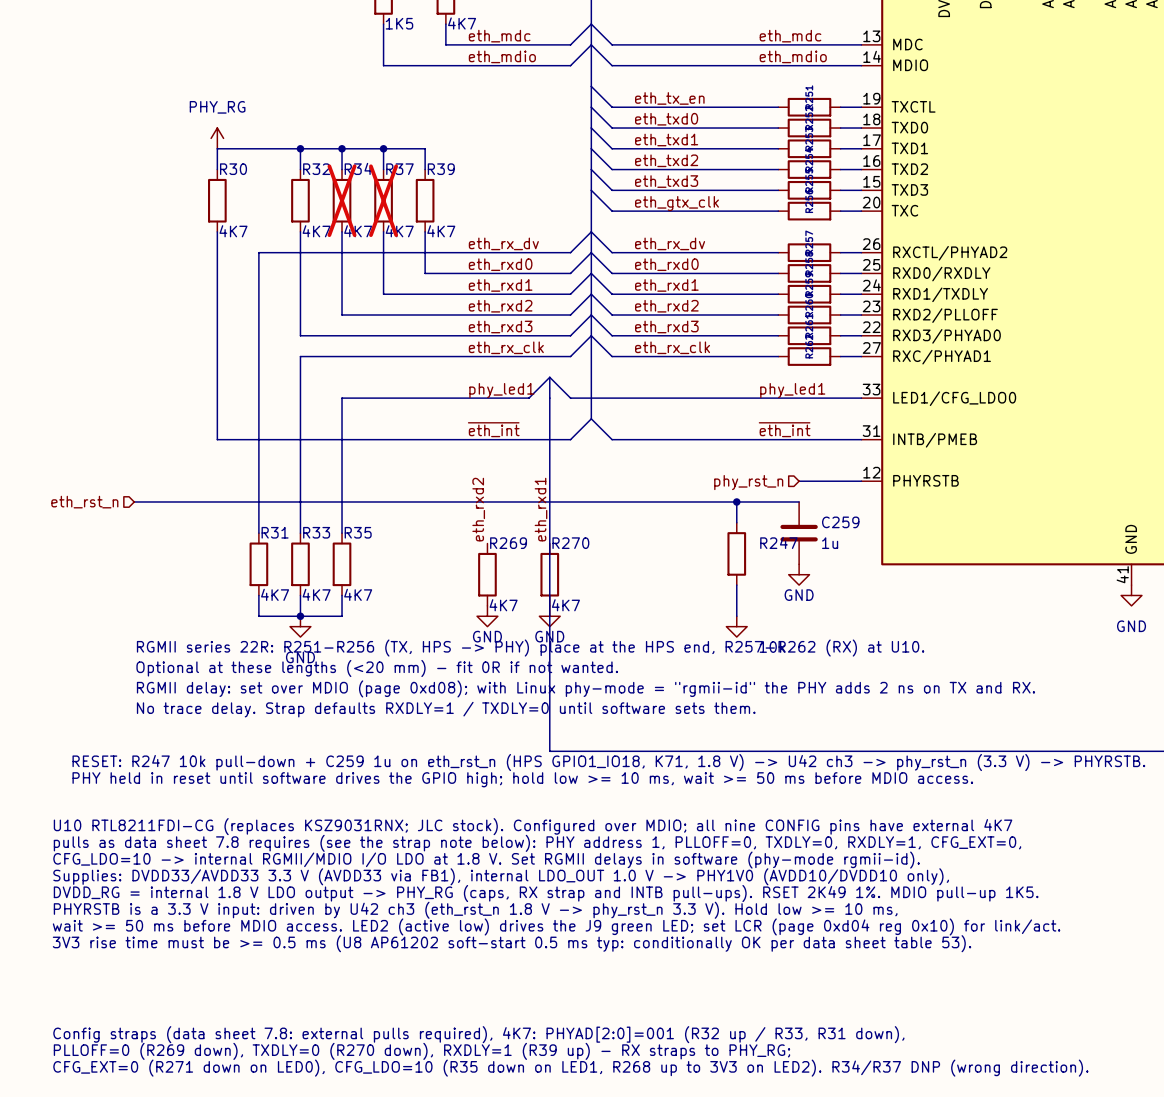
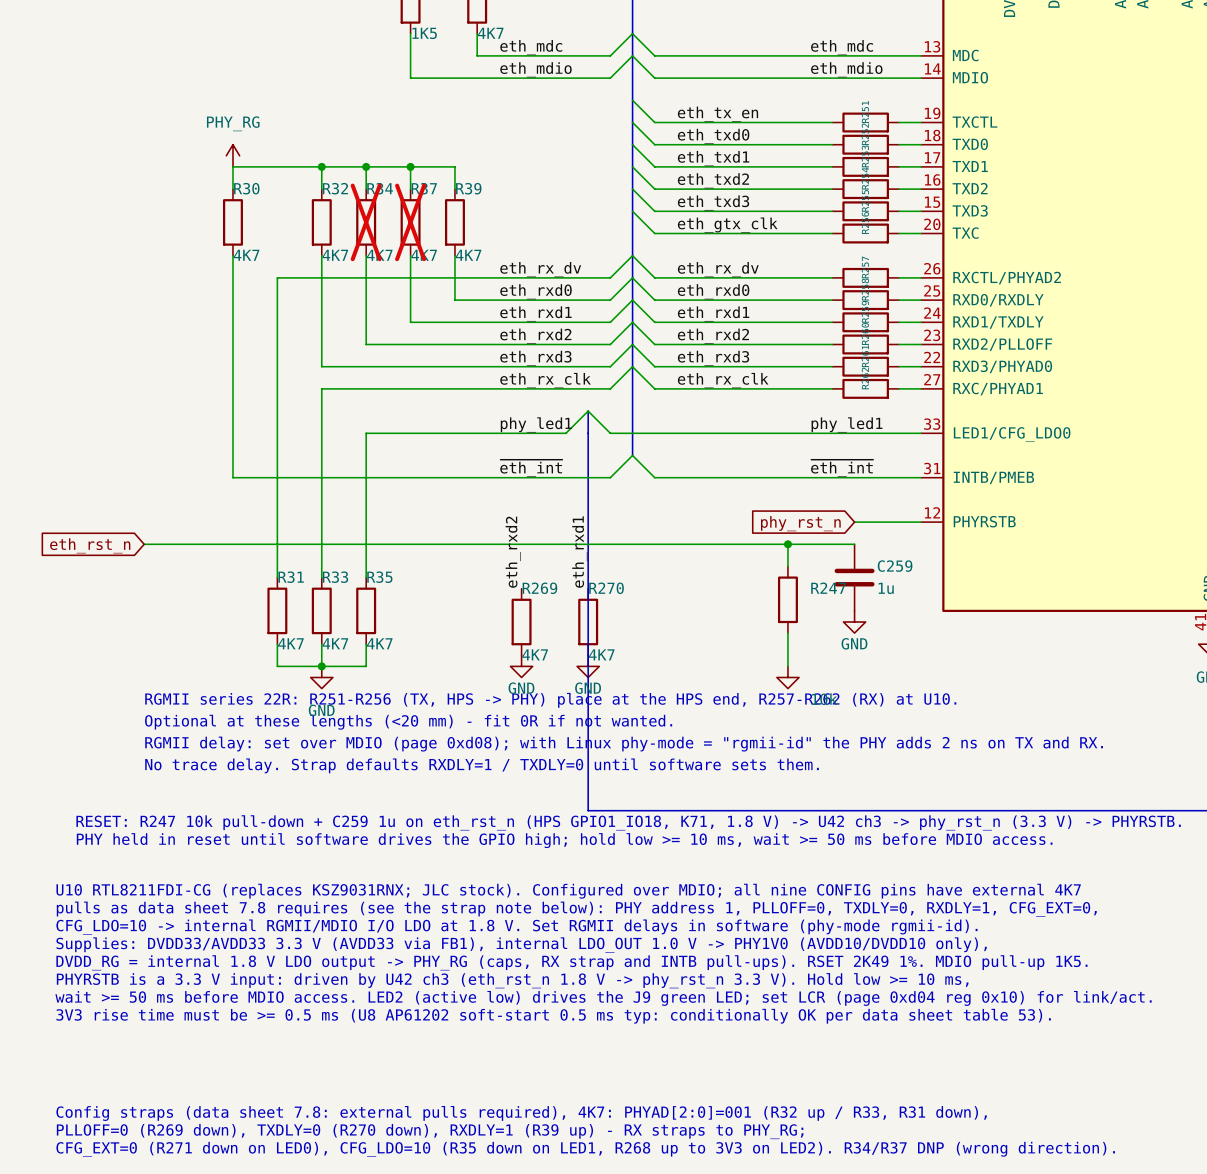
hierarchical label: phy_rst_n (748, 482) -> none
global label: none -> phy_rst_n (800, 523)
hierarchical label: eth_rst_n (84, 502) -> none
global label: none -> eth_rst_n (90, 545)

